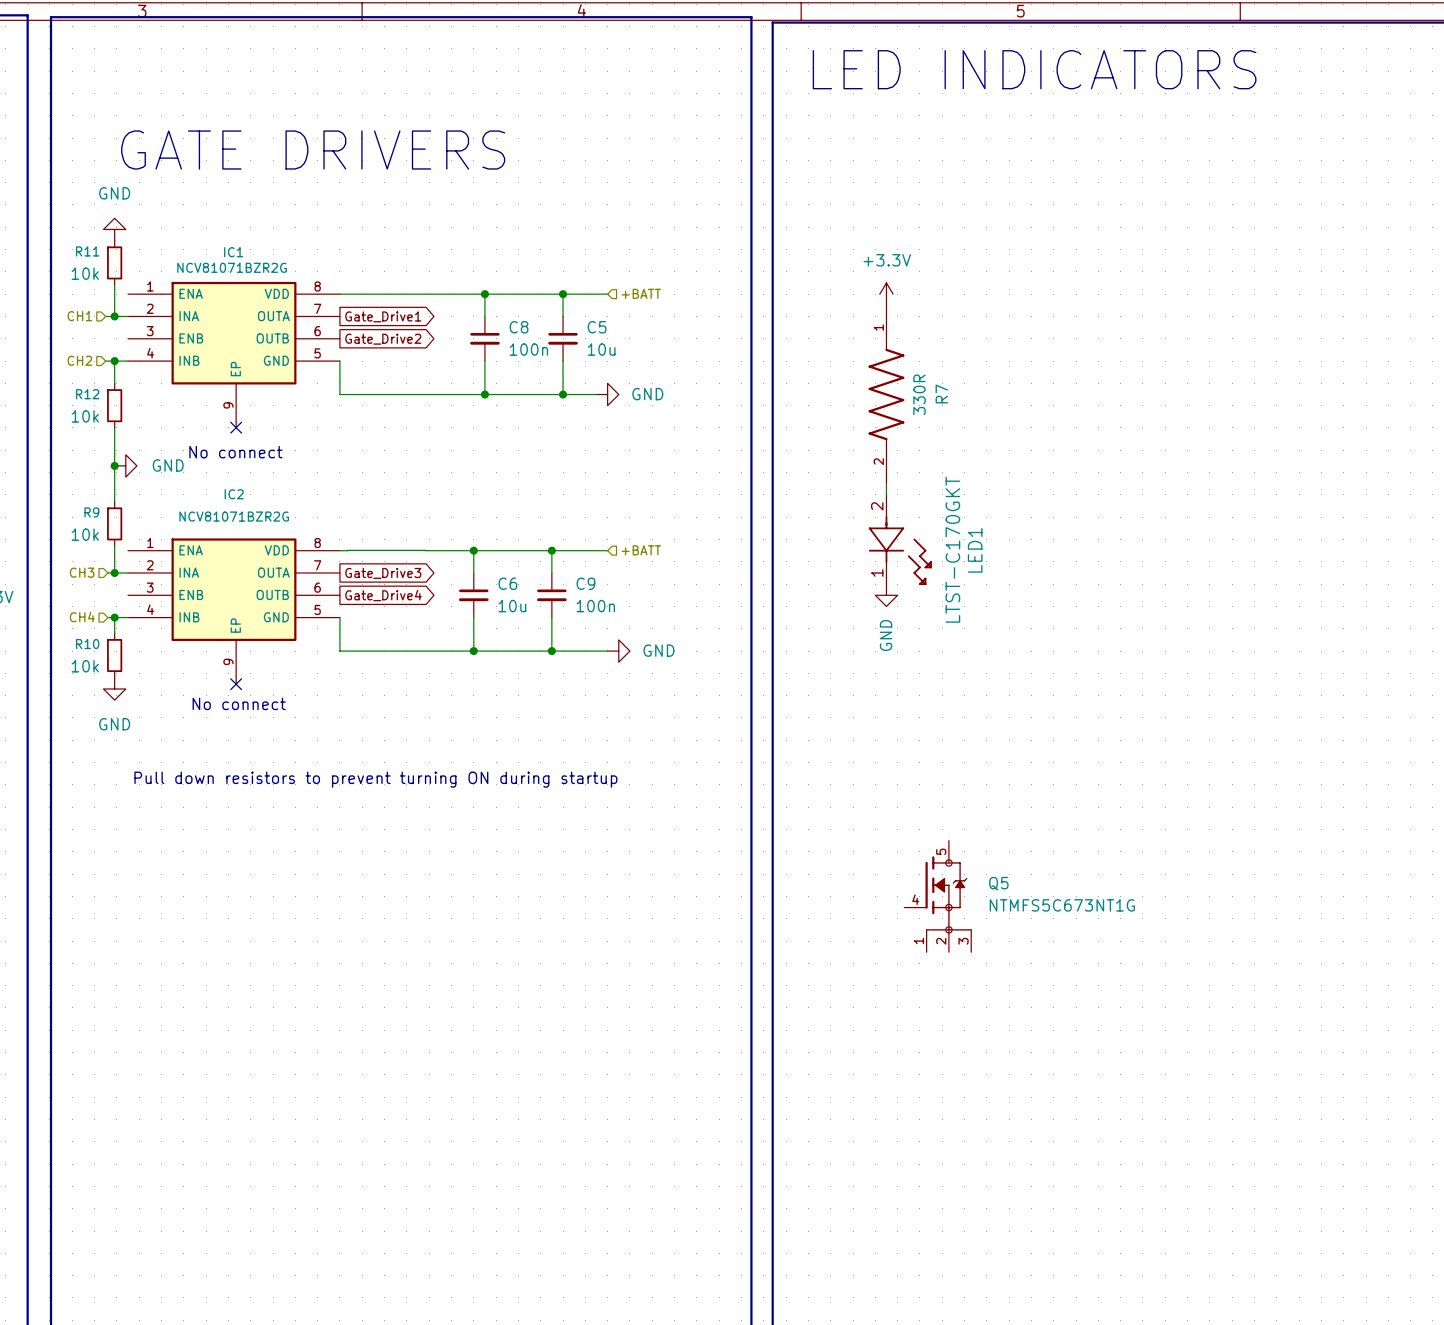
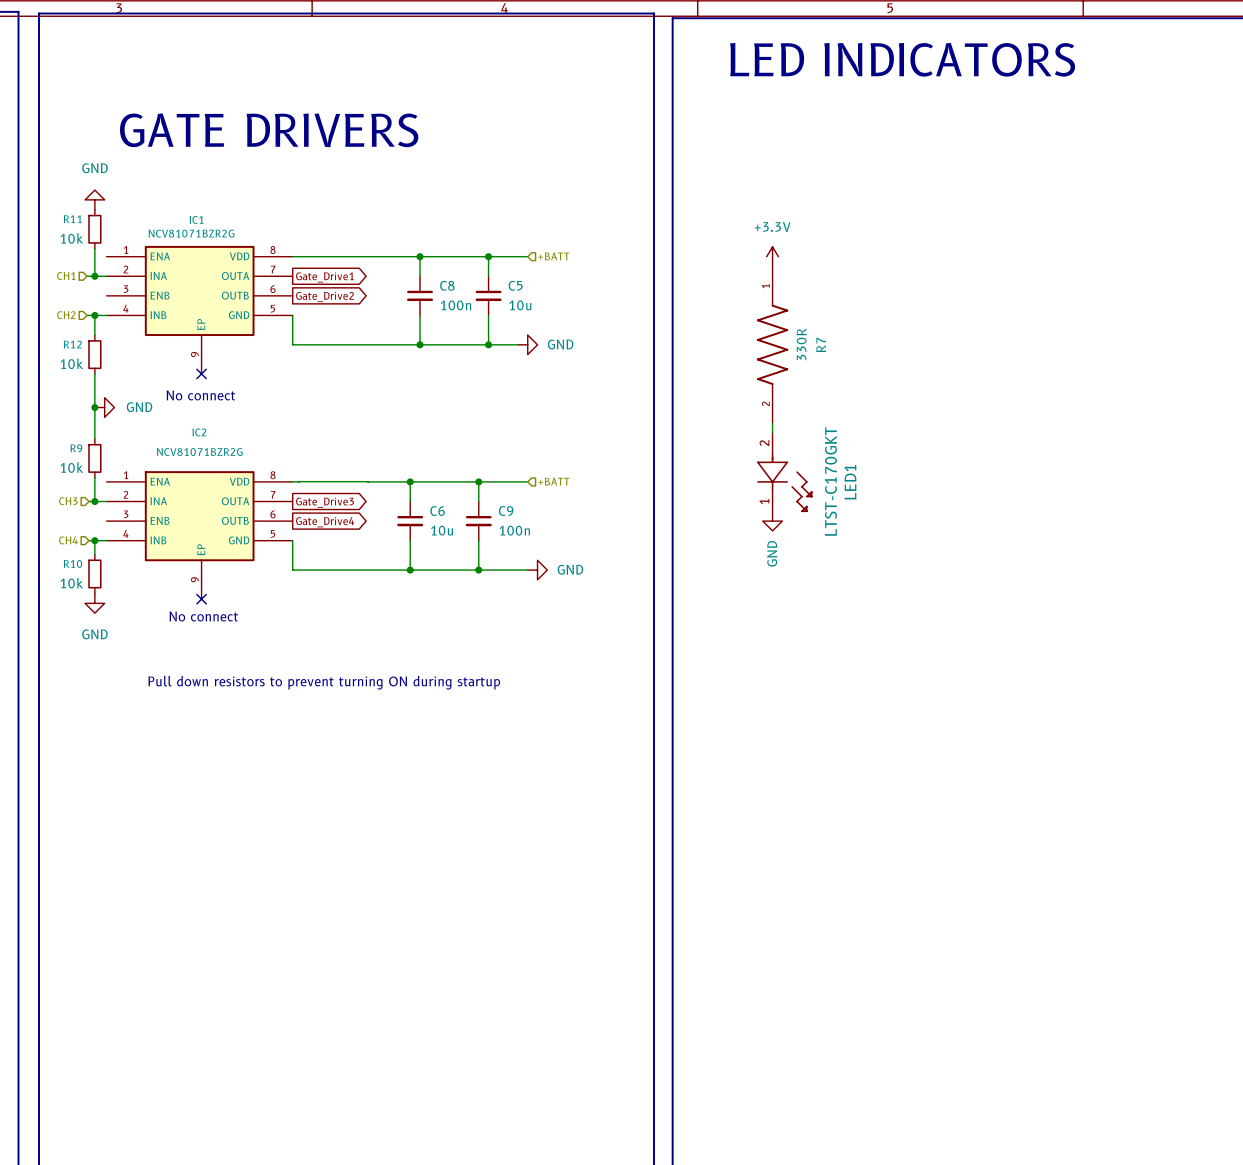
Q5: NTMFS5C673NT1G (938, 896) -> none

